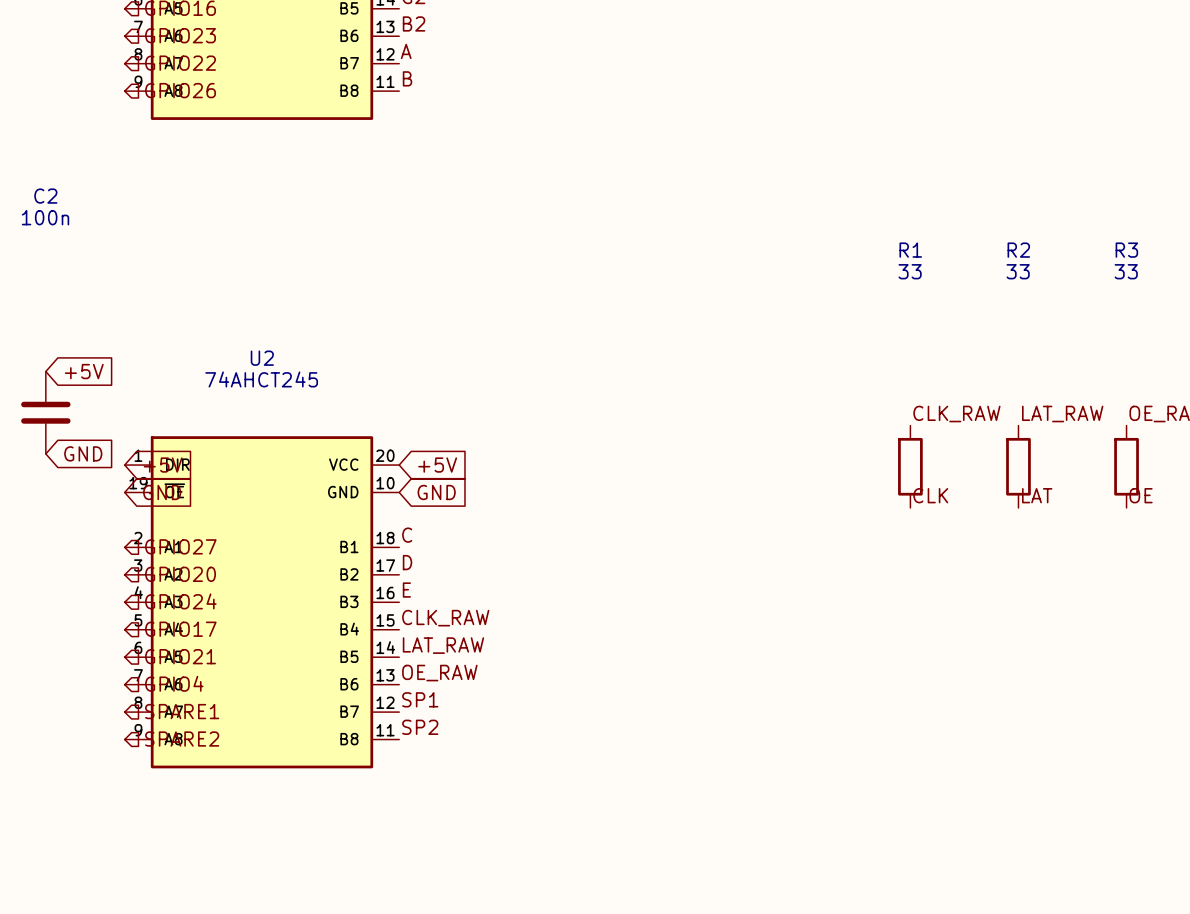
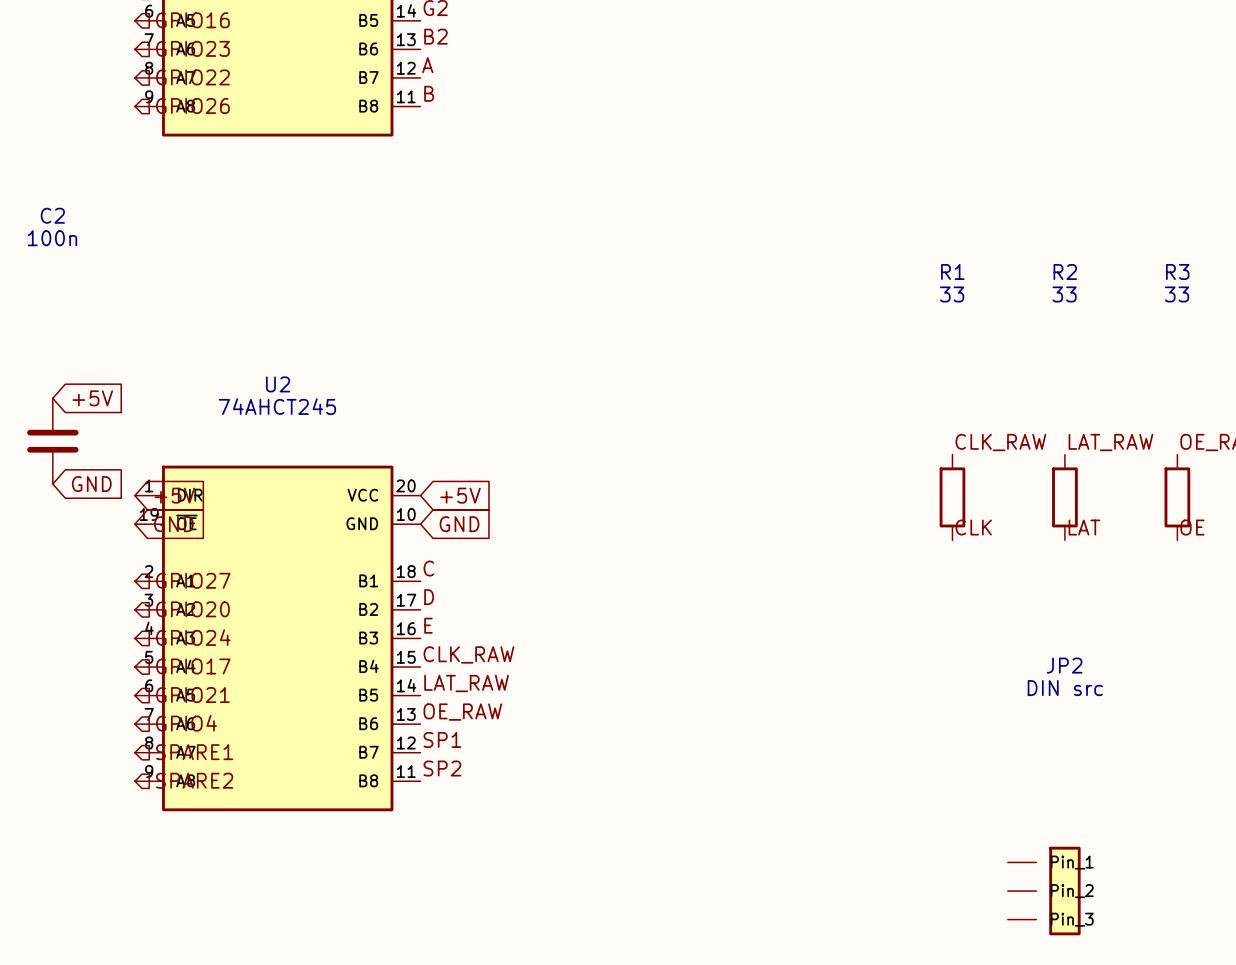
JP2: none -> DIN src (1044, 891)

